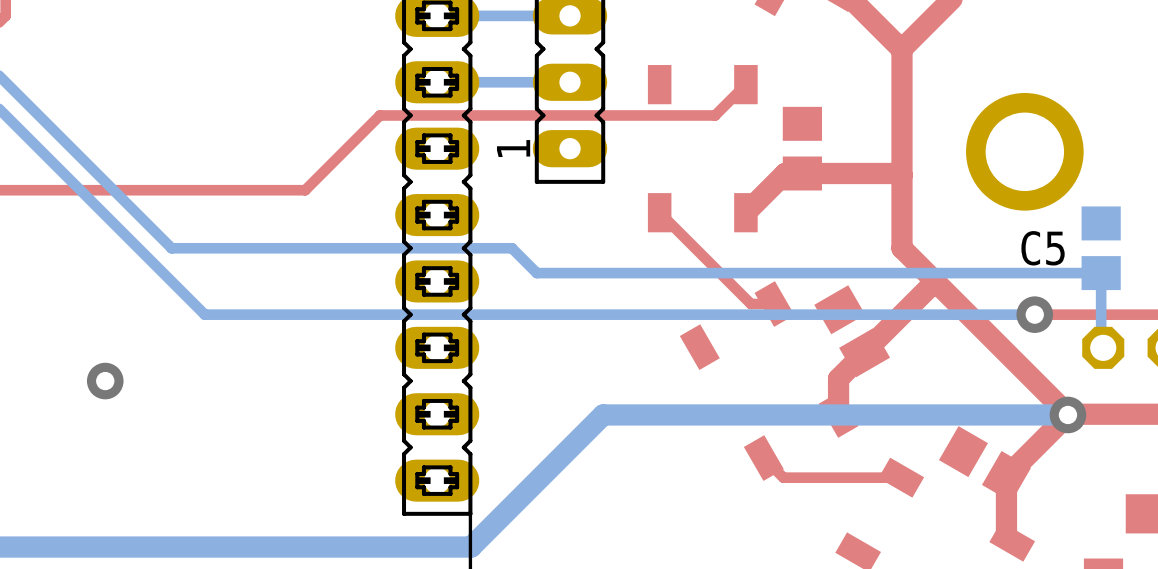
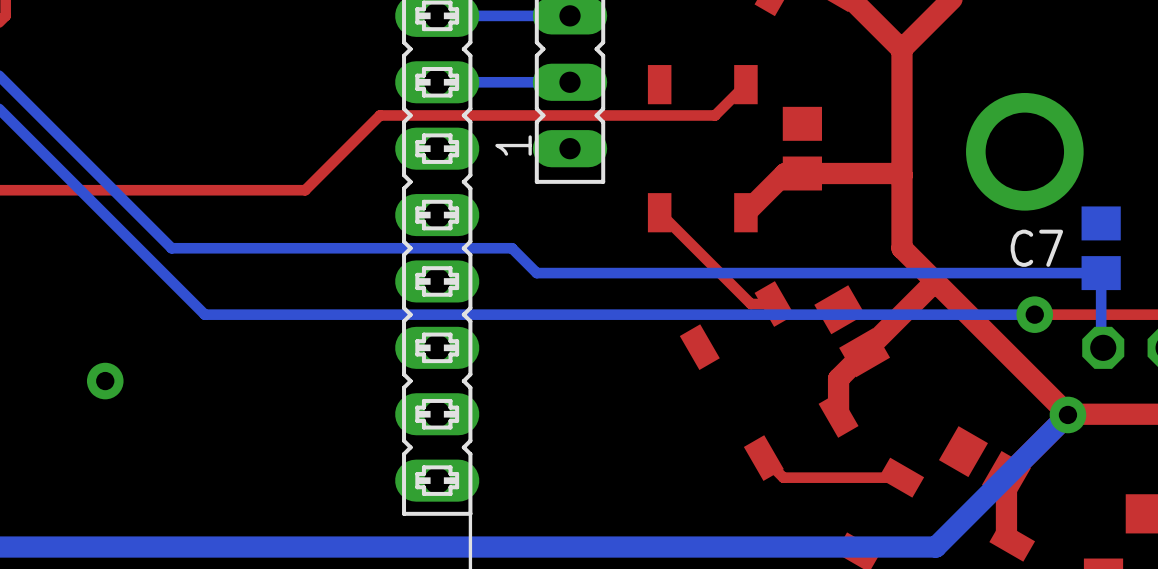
C5 name: C5 (1043, 248) -> C7 (1036, 248)
bottom track: (1067, 414) (603, 414) (471, 547) -> (1067, 414) (935, 547) (471, 547)

